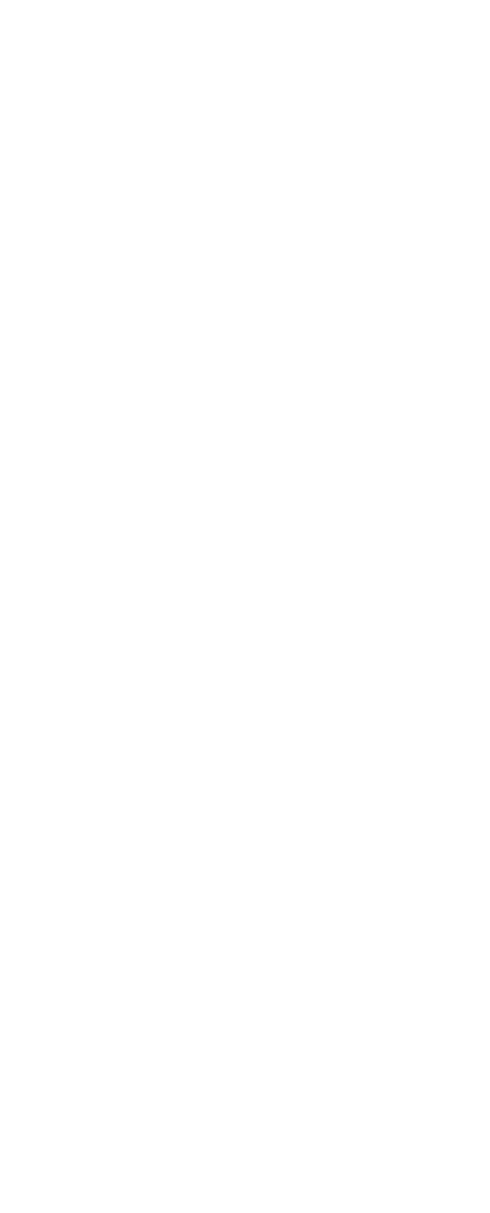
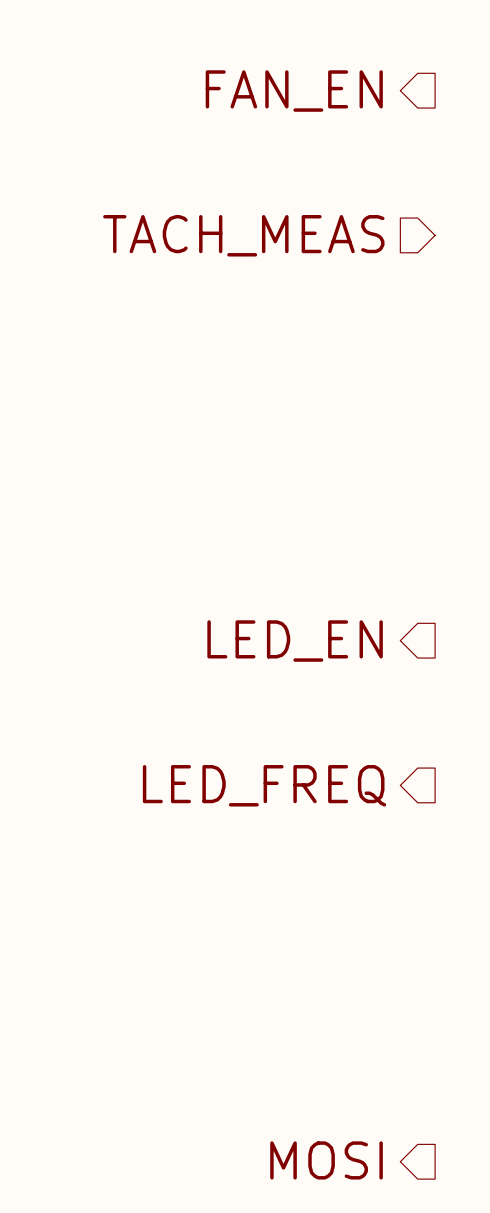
hierarchical label: none -> FAN_EN (294, 91)
hierarchical label: none -> TACH_MEAS (243, 235)
hierarchical label: none -> LED_EN (295, 641)
hierarchical label: none -> LED_FREQ (264, 785)
hierarchical label: none -> MOSI (326, 1160)

